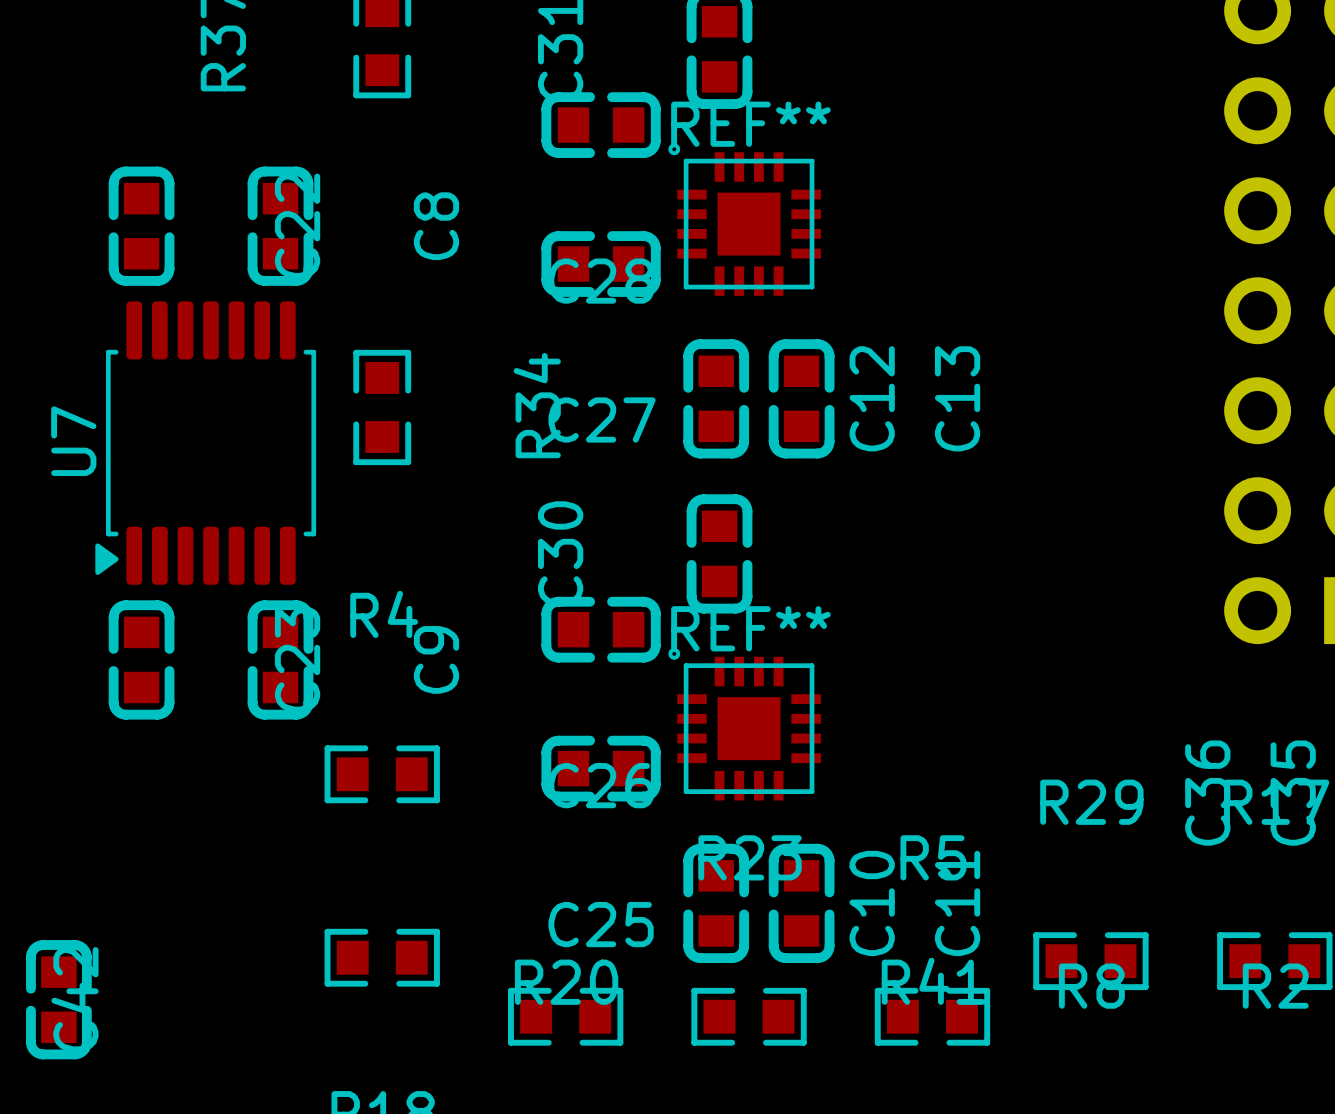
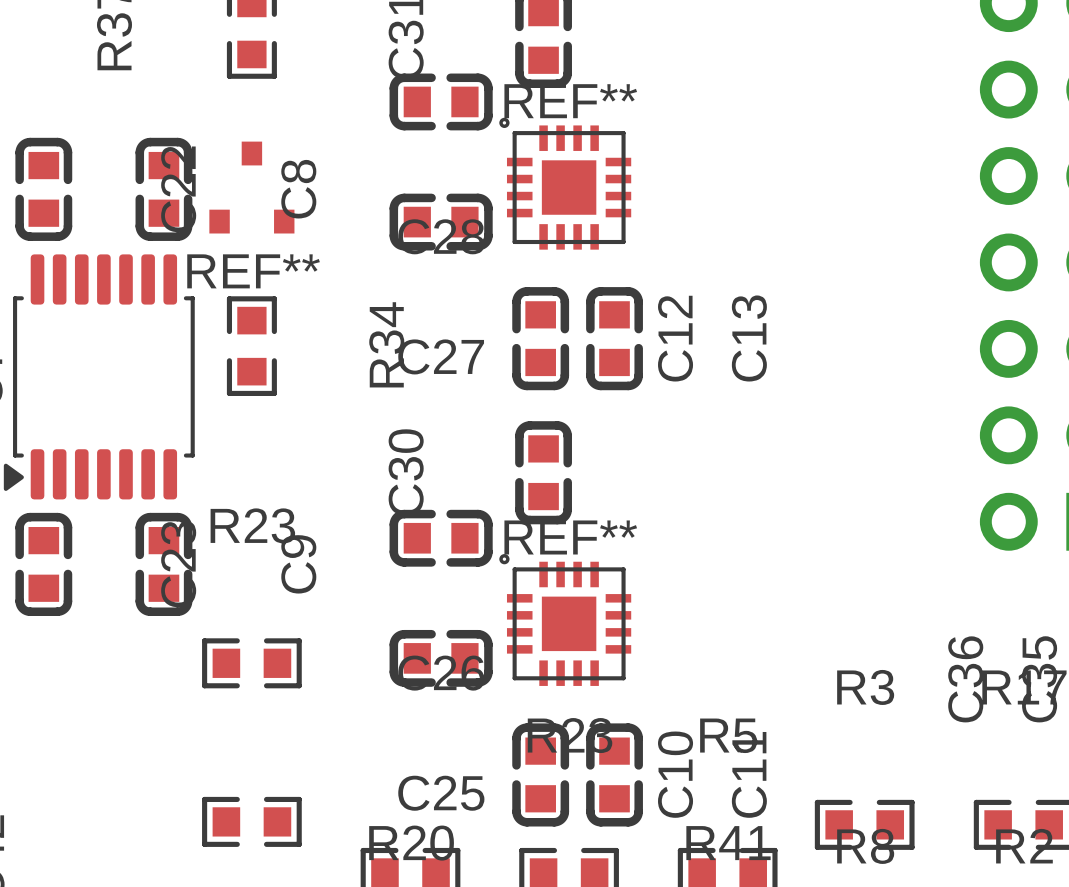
REF**: none -> (251, 187)
R4 name: R4 (384, 614) -> R23 (252, 525)
R29 name: R29 (1091, 802) -> R3 (865, 687)

